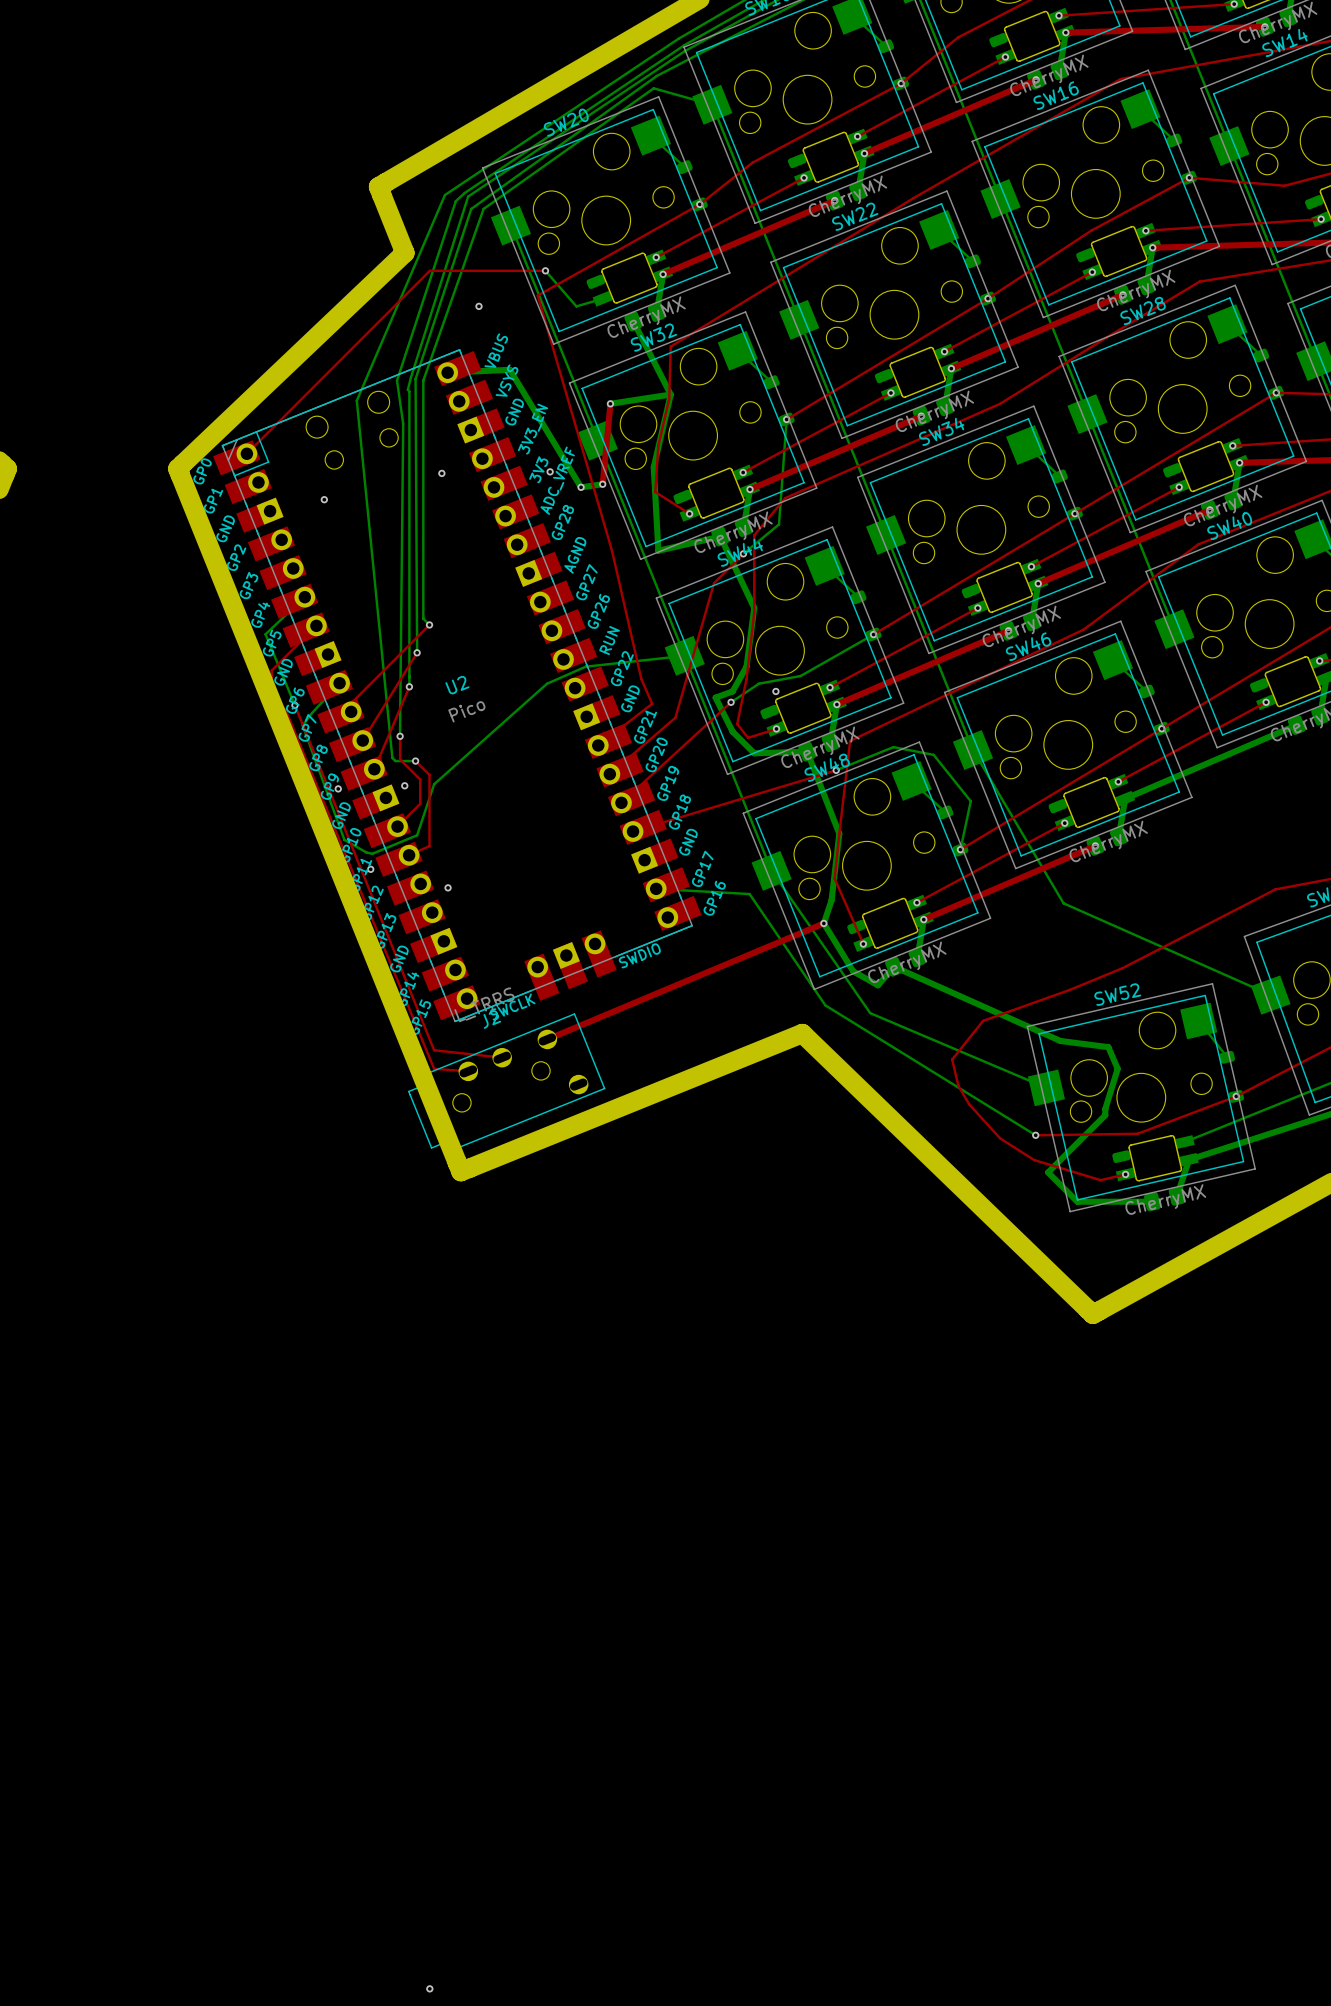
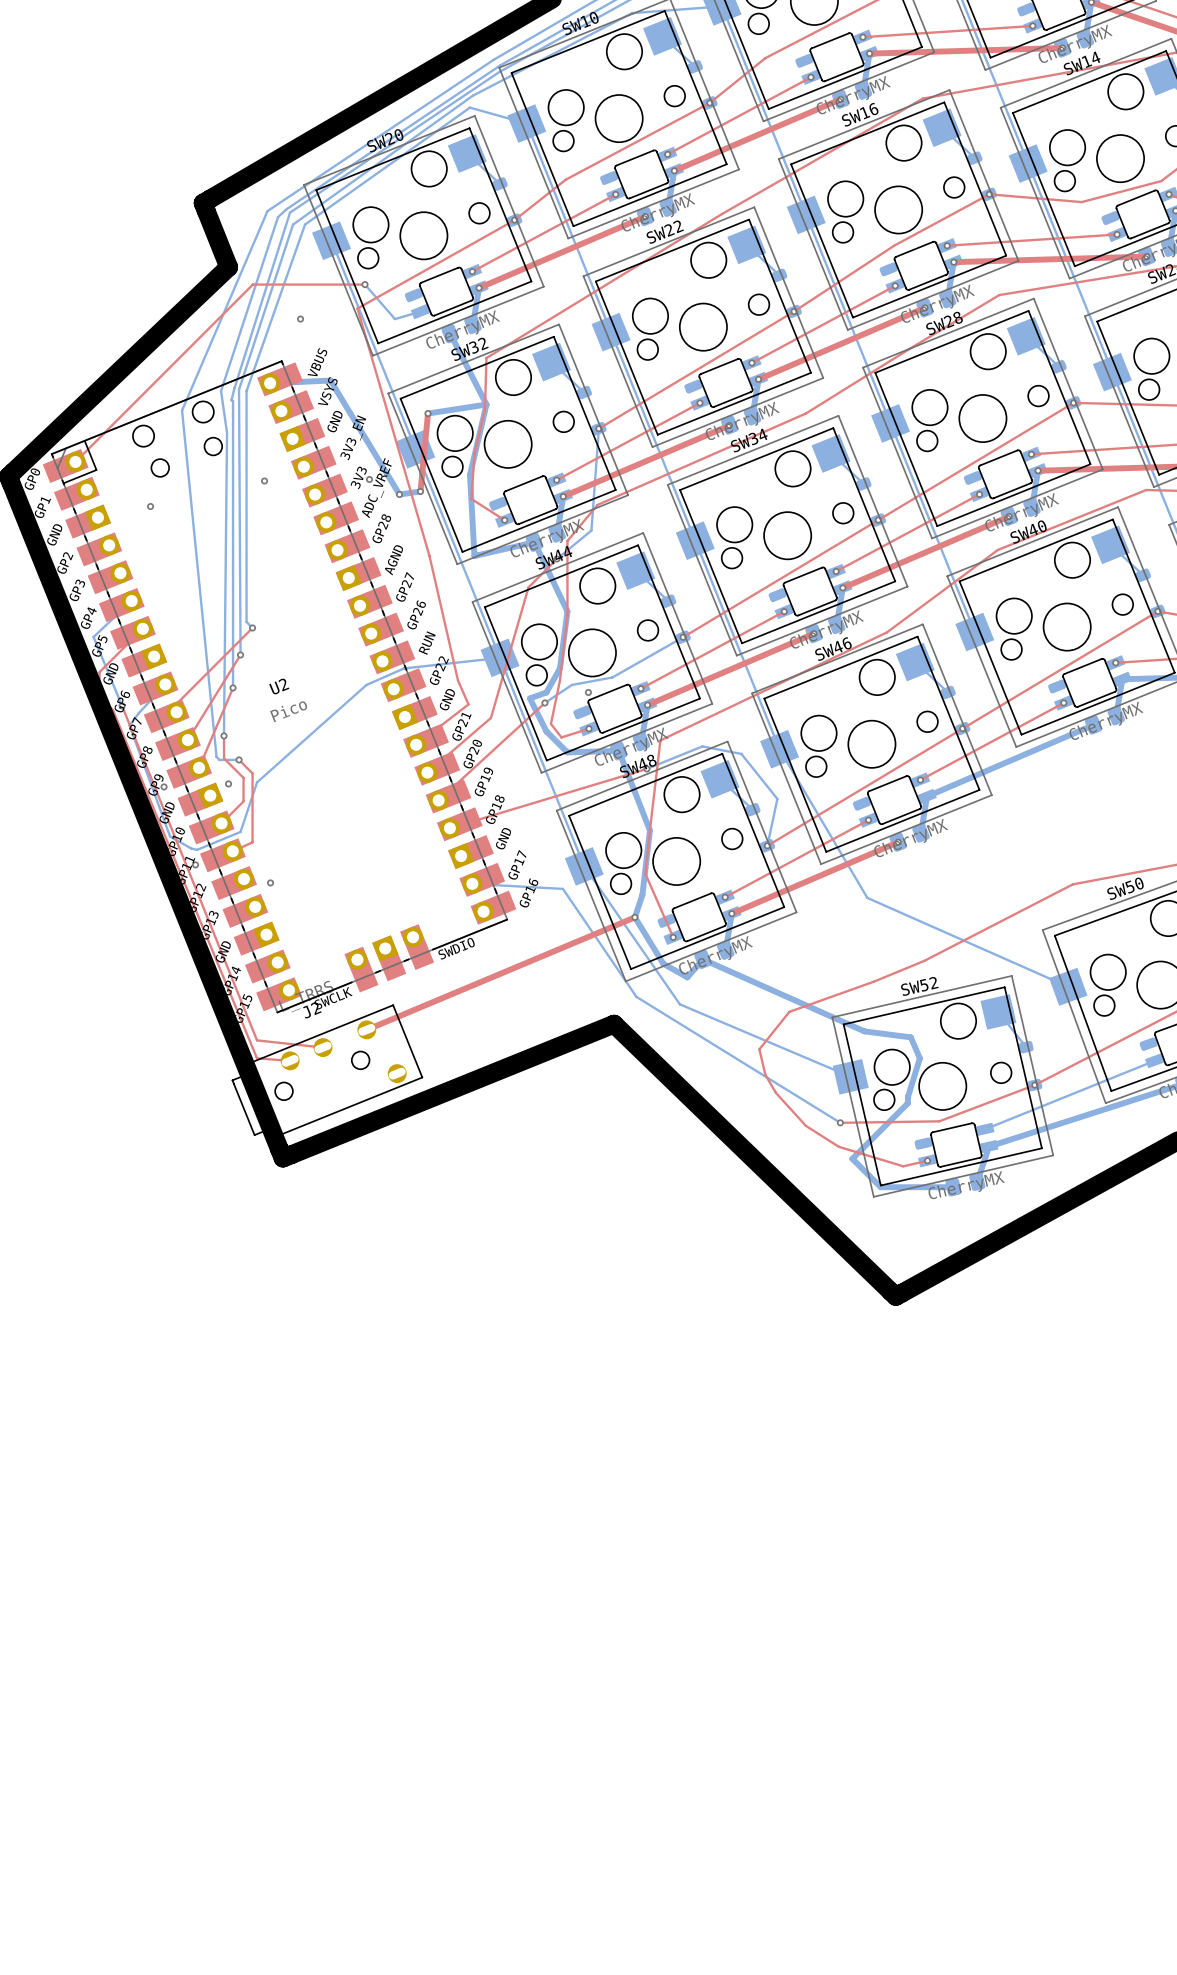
via: (429, 1988) -> none

